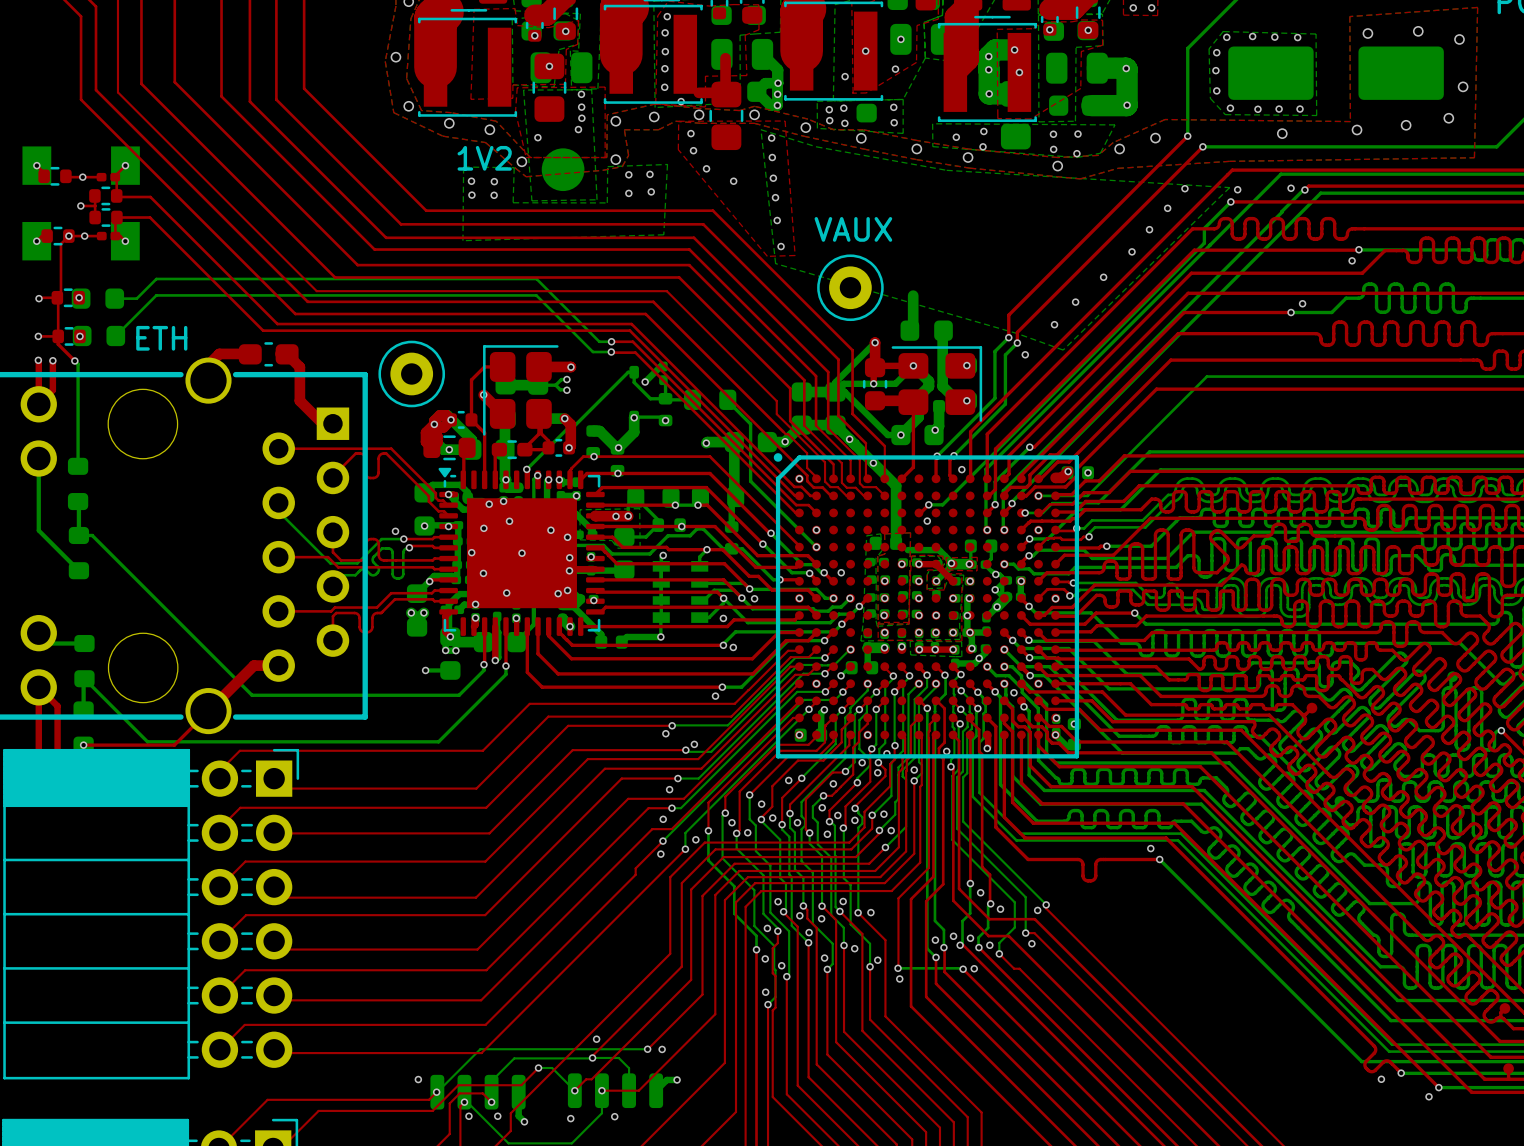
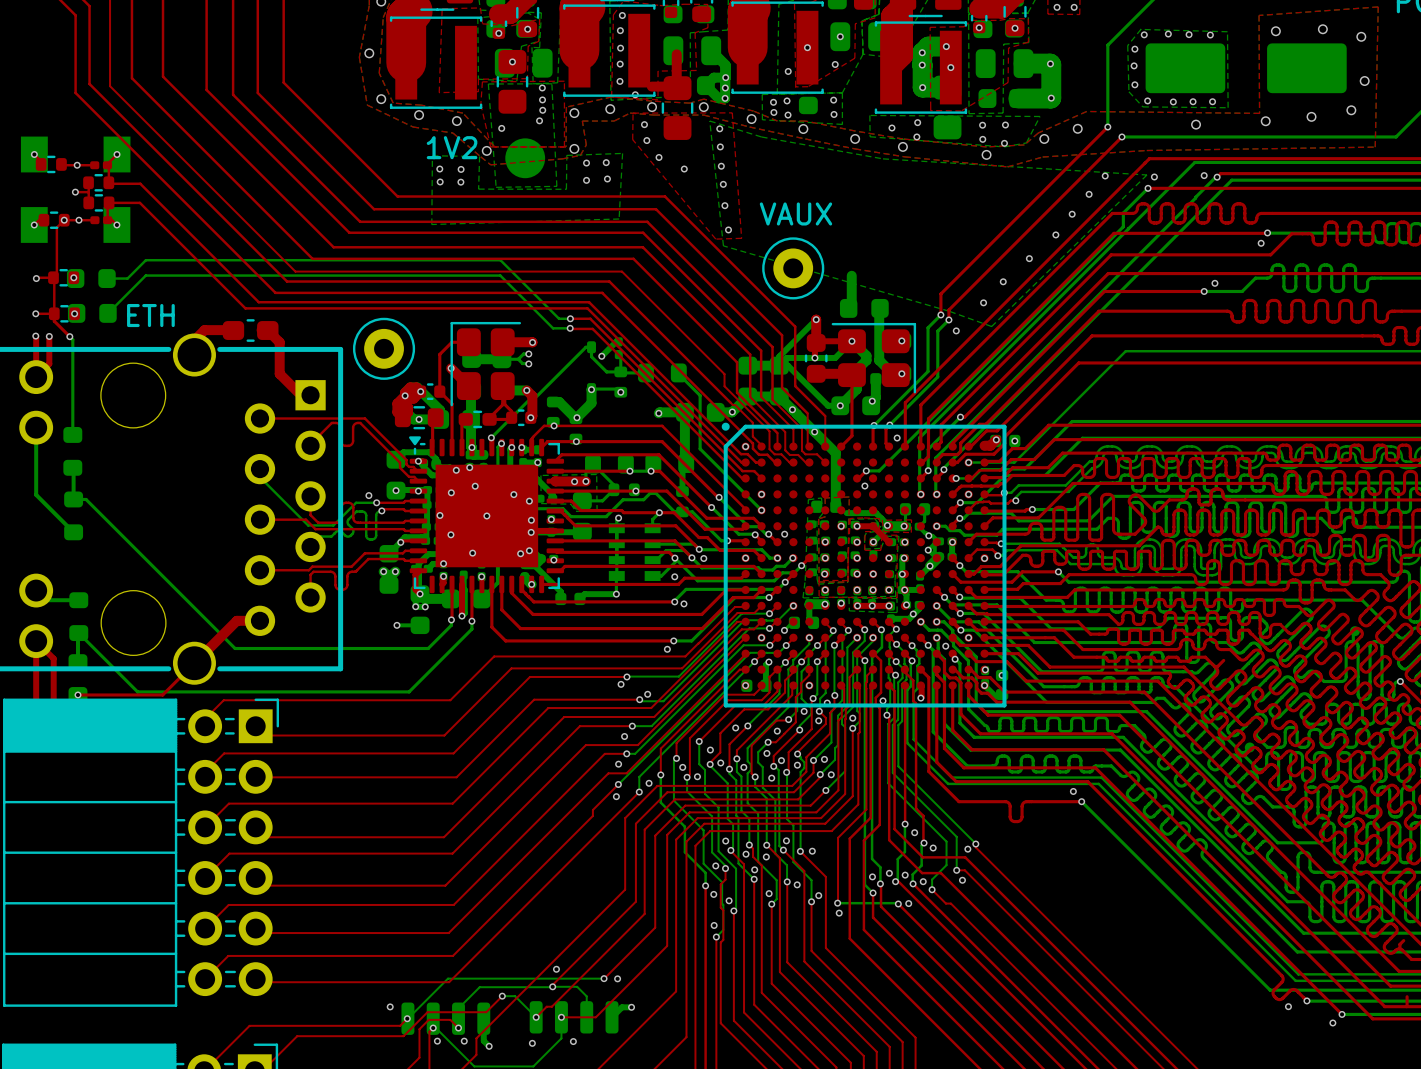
part: (1311, 708) -> none
part: (1504, 1008) -> none
part: (1508, 1068) -> none

